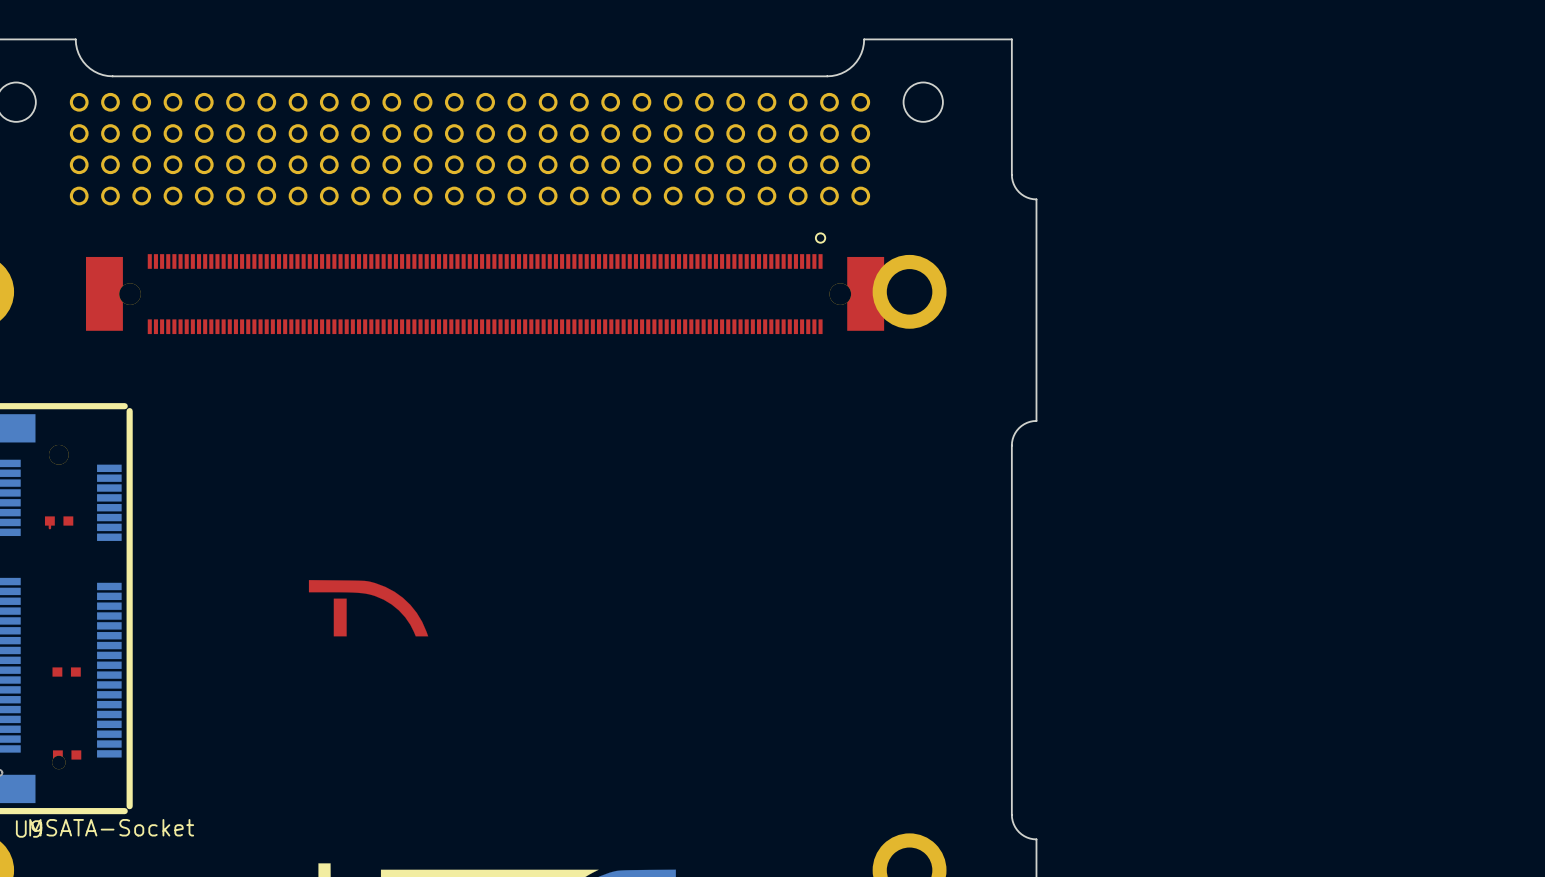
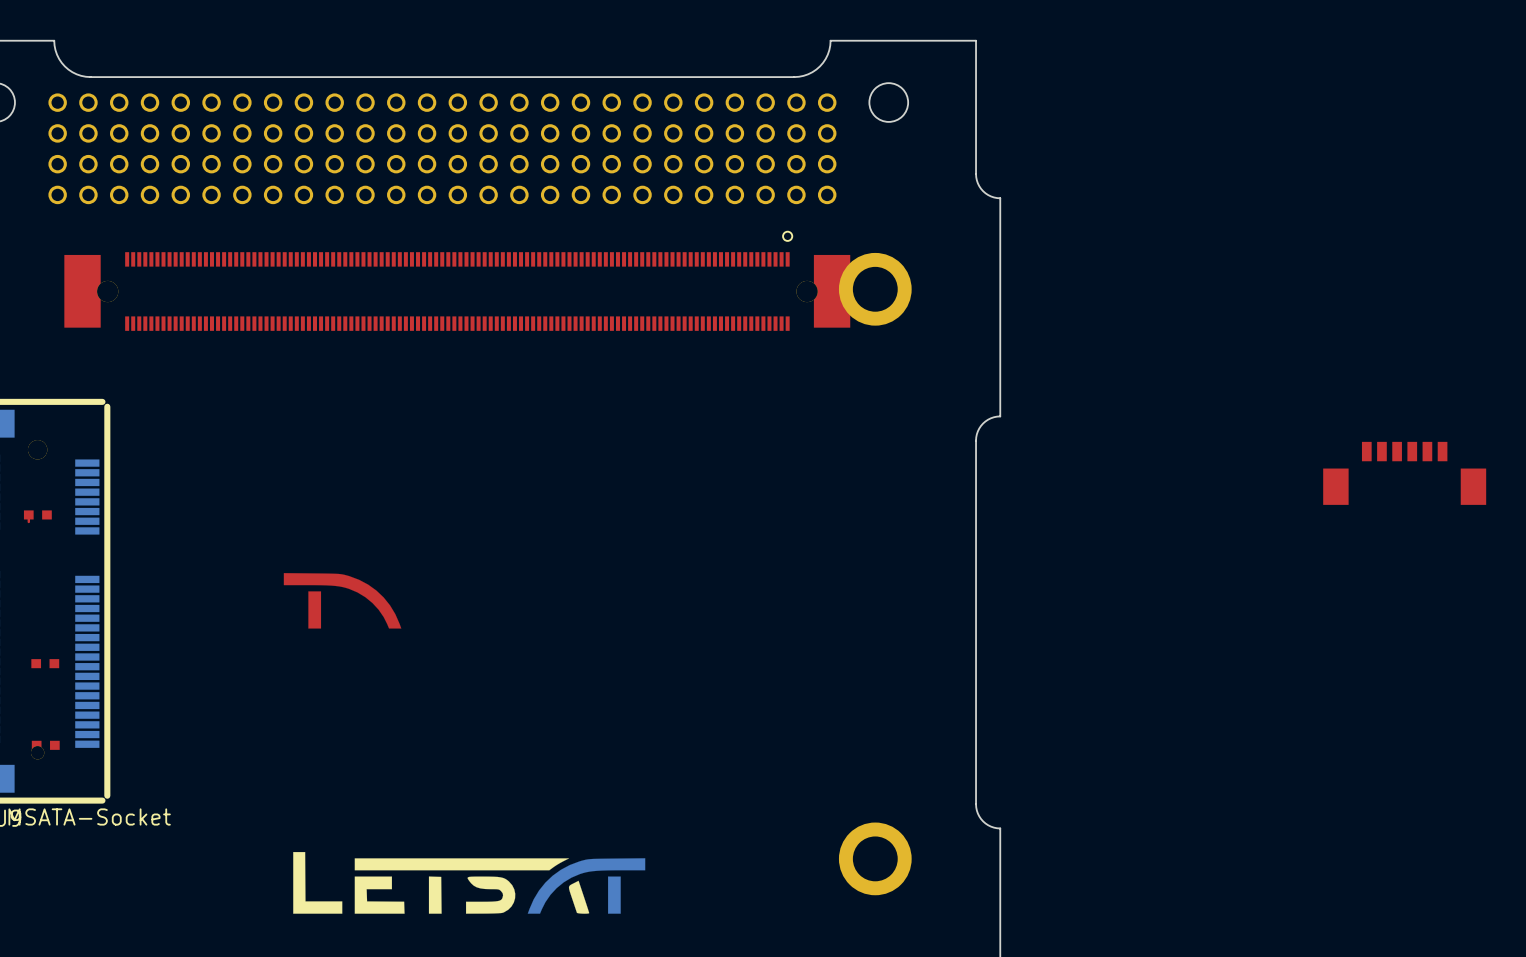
part: none -> (1404, 473)

